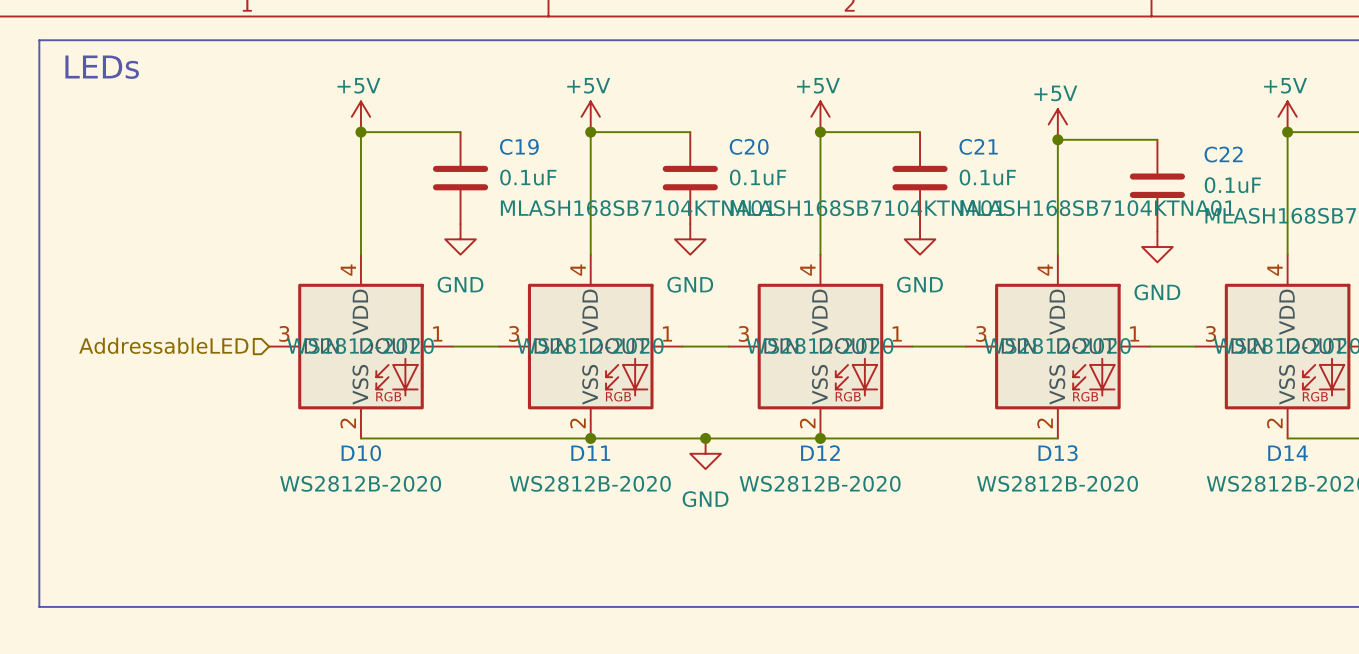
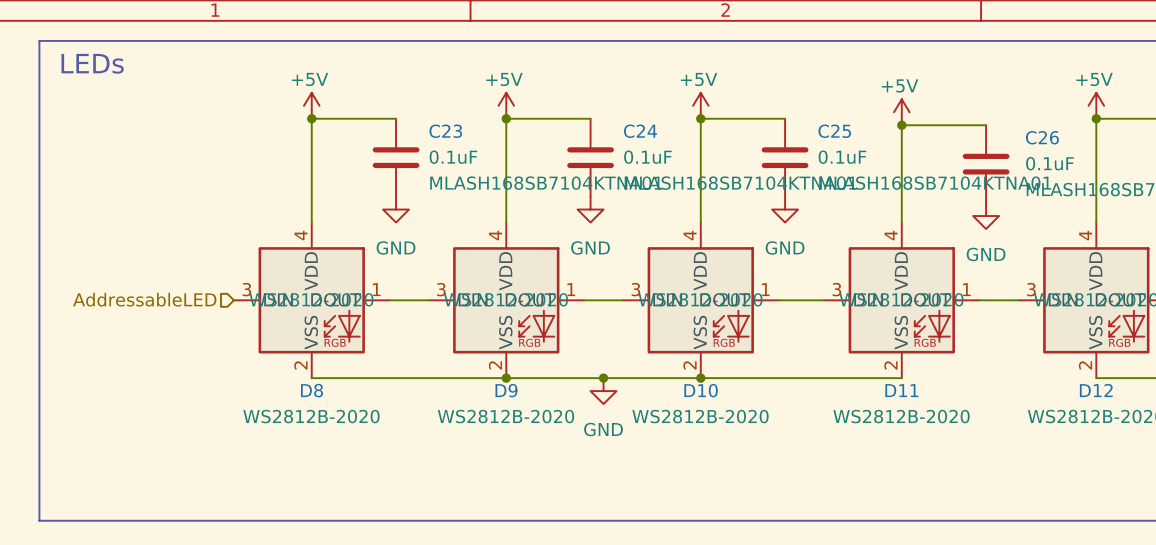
C19 name: C19 (519, 146) -> C23 (445, 131)
C20 name: C20 (749, 146) -> C24 (640, 131)
C21 name: C21 (978, 146) -> C25 (834, 131)
C22 name: C22 (1223, 154) -> C26 (1042, 137)
D10 name: D10 (361, 453) -> D8 (312, 390)
D11 name: D11 (590, 453) -> D9 (506, 390)
D12 name: D12 (820, 453) -> D10 (701, 390)
D13 name: D13 (1058, 453) -> D11 (901, 390)
D14 name: D14 (1288, 453) -> D12 (1096, 390)

